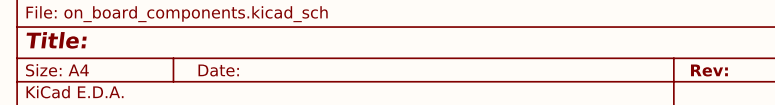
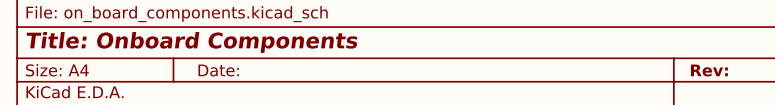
title block: Title: (56, 40) -> Title: Onboard Components (191, 42)

